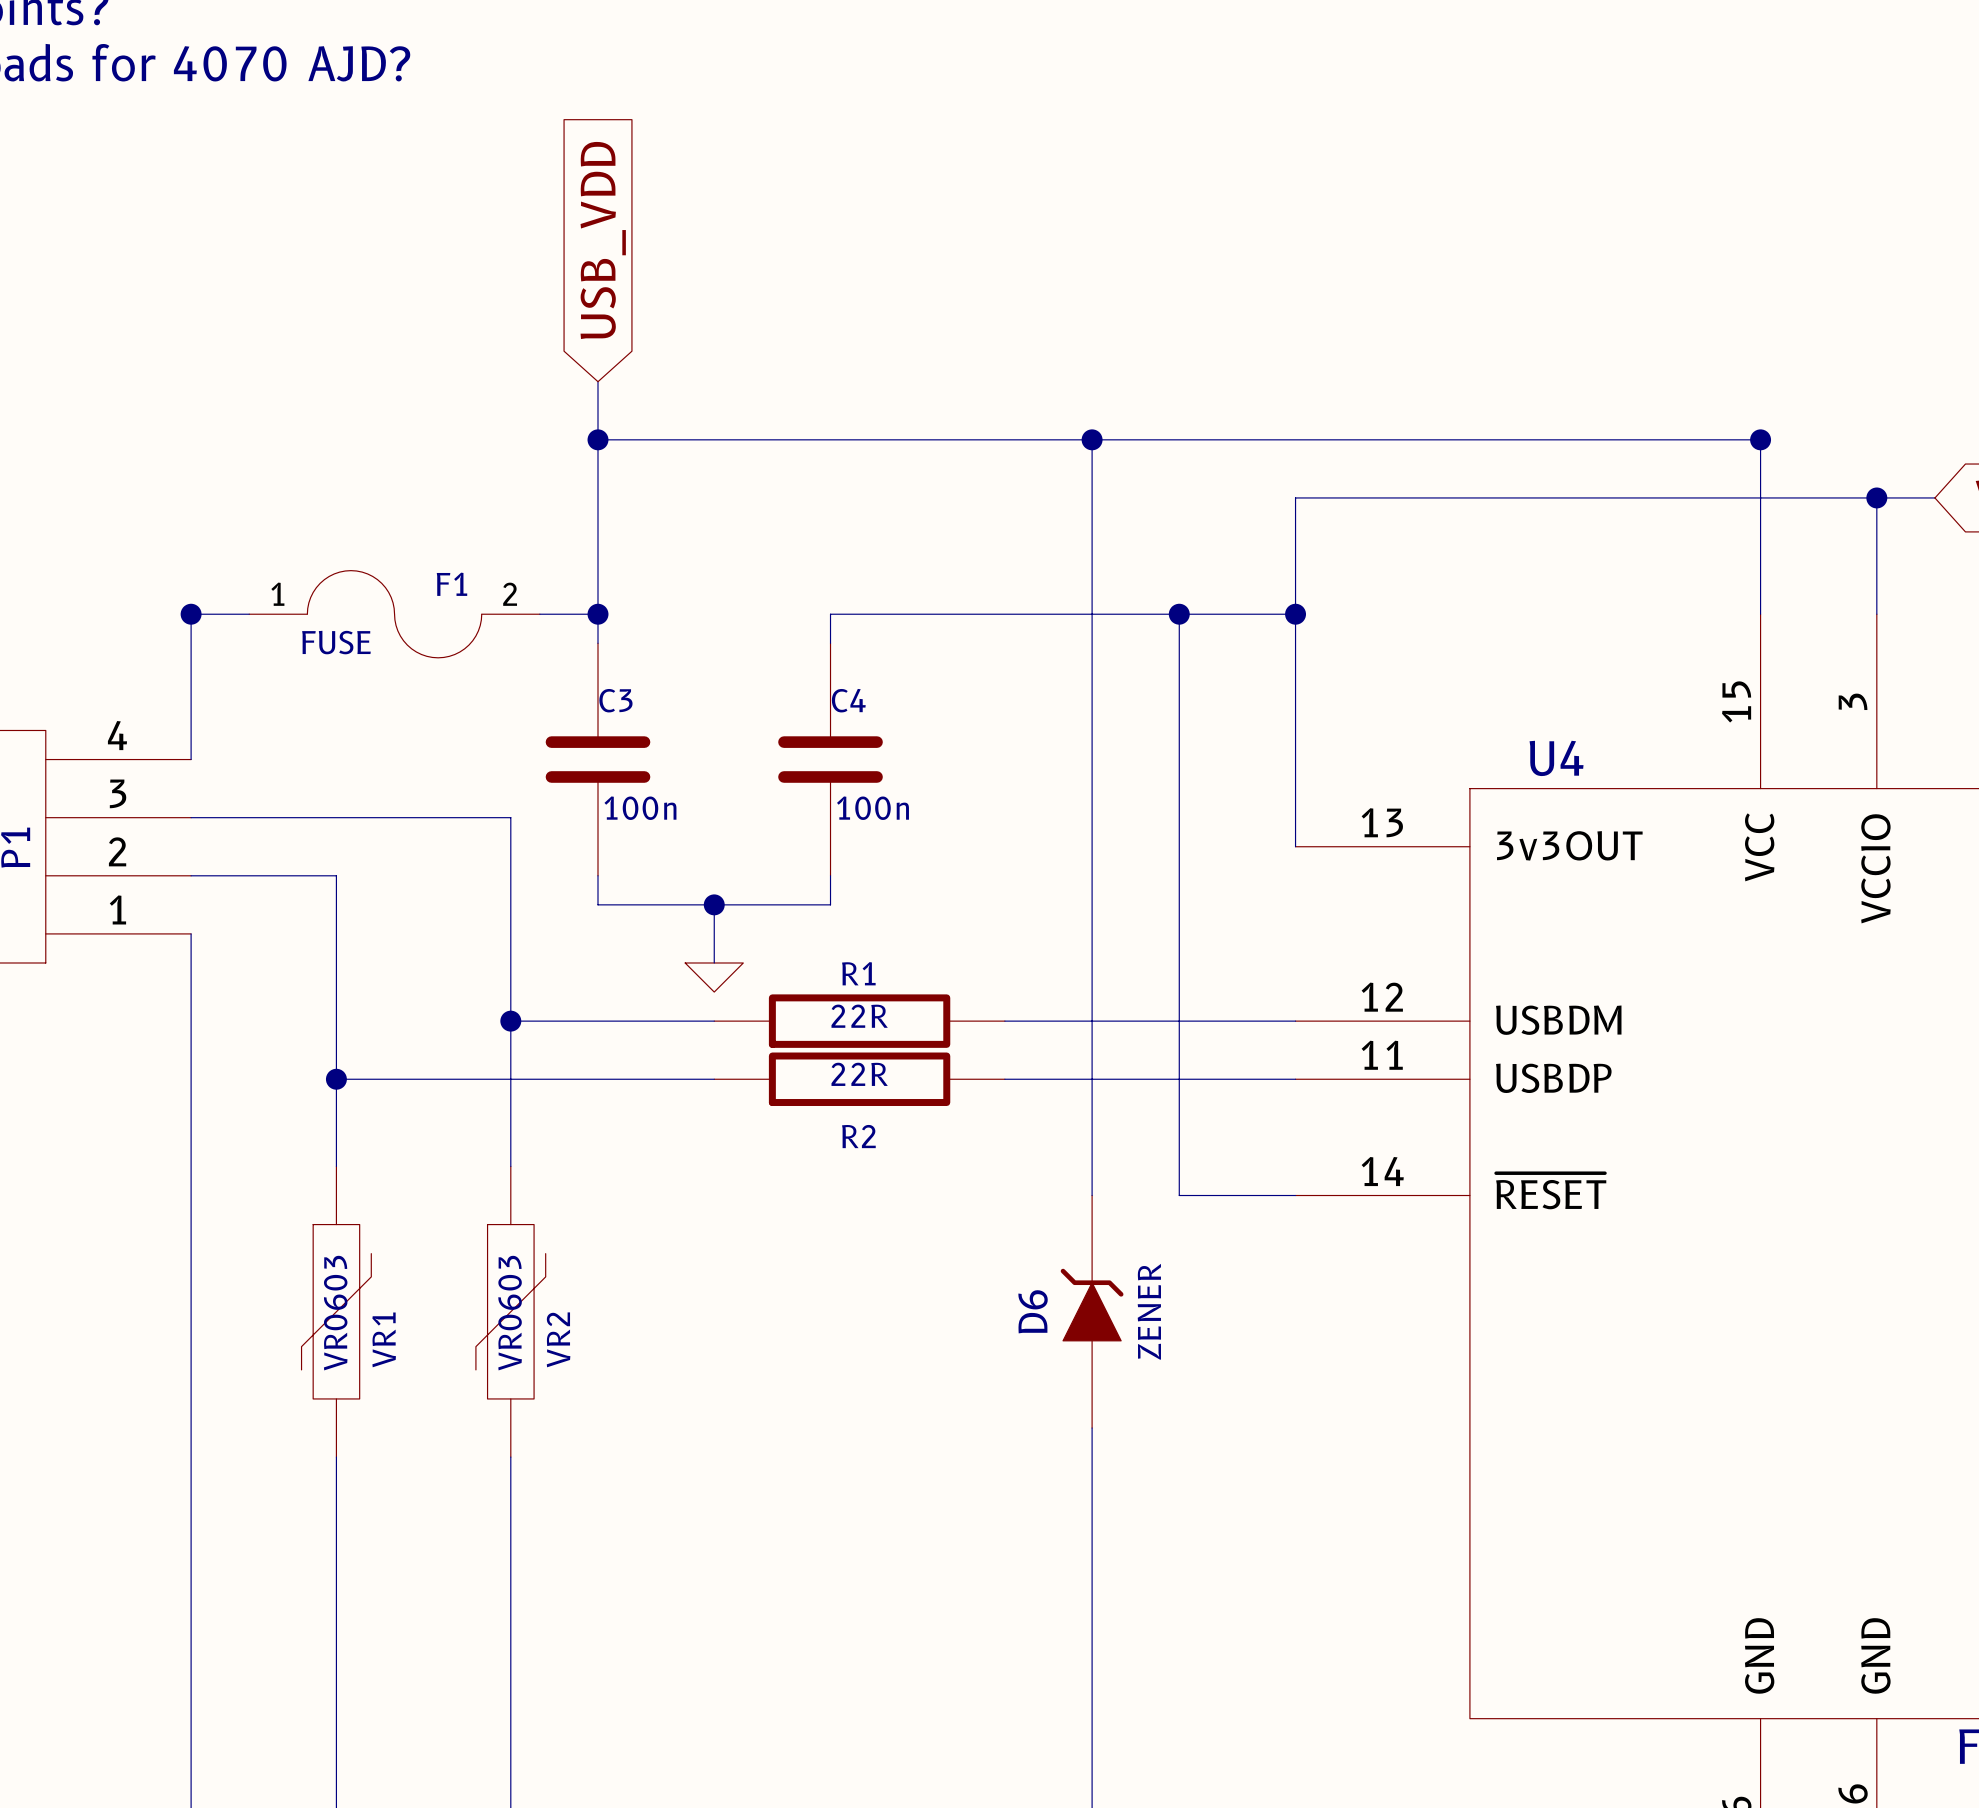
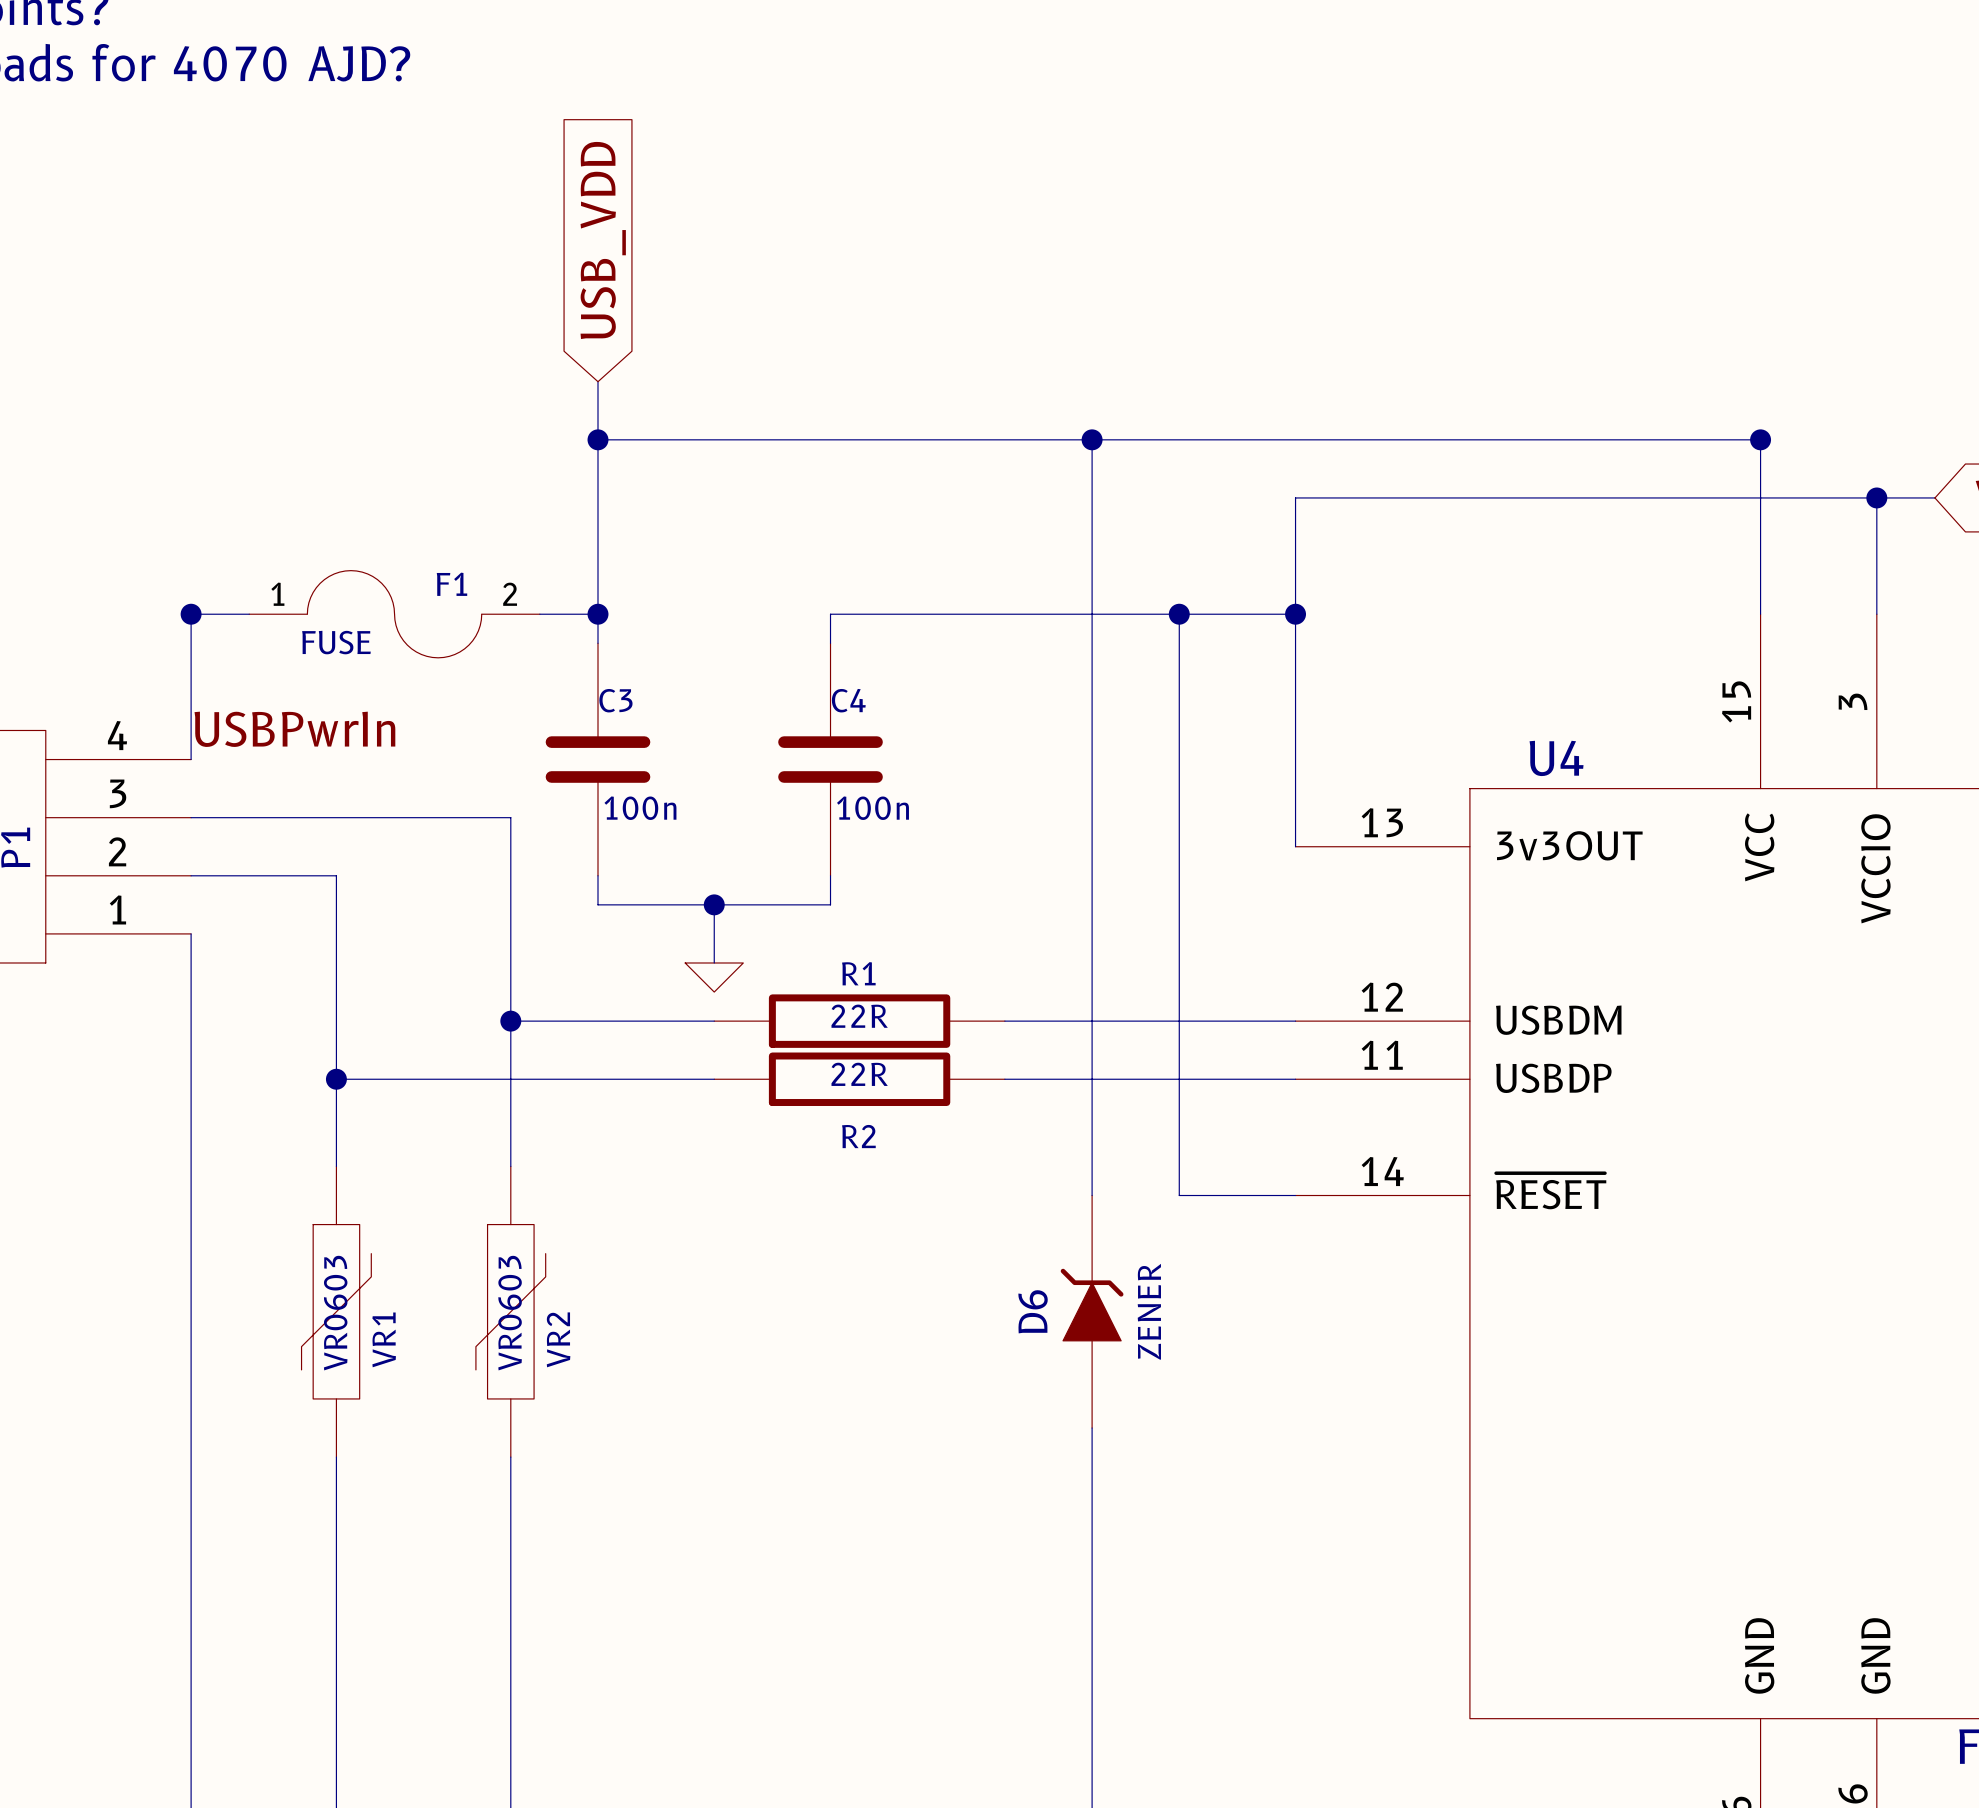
label: none -> USBPwrIn (294, 729)

